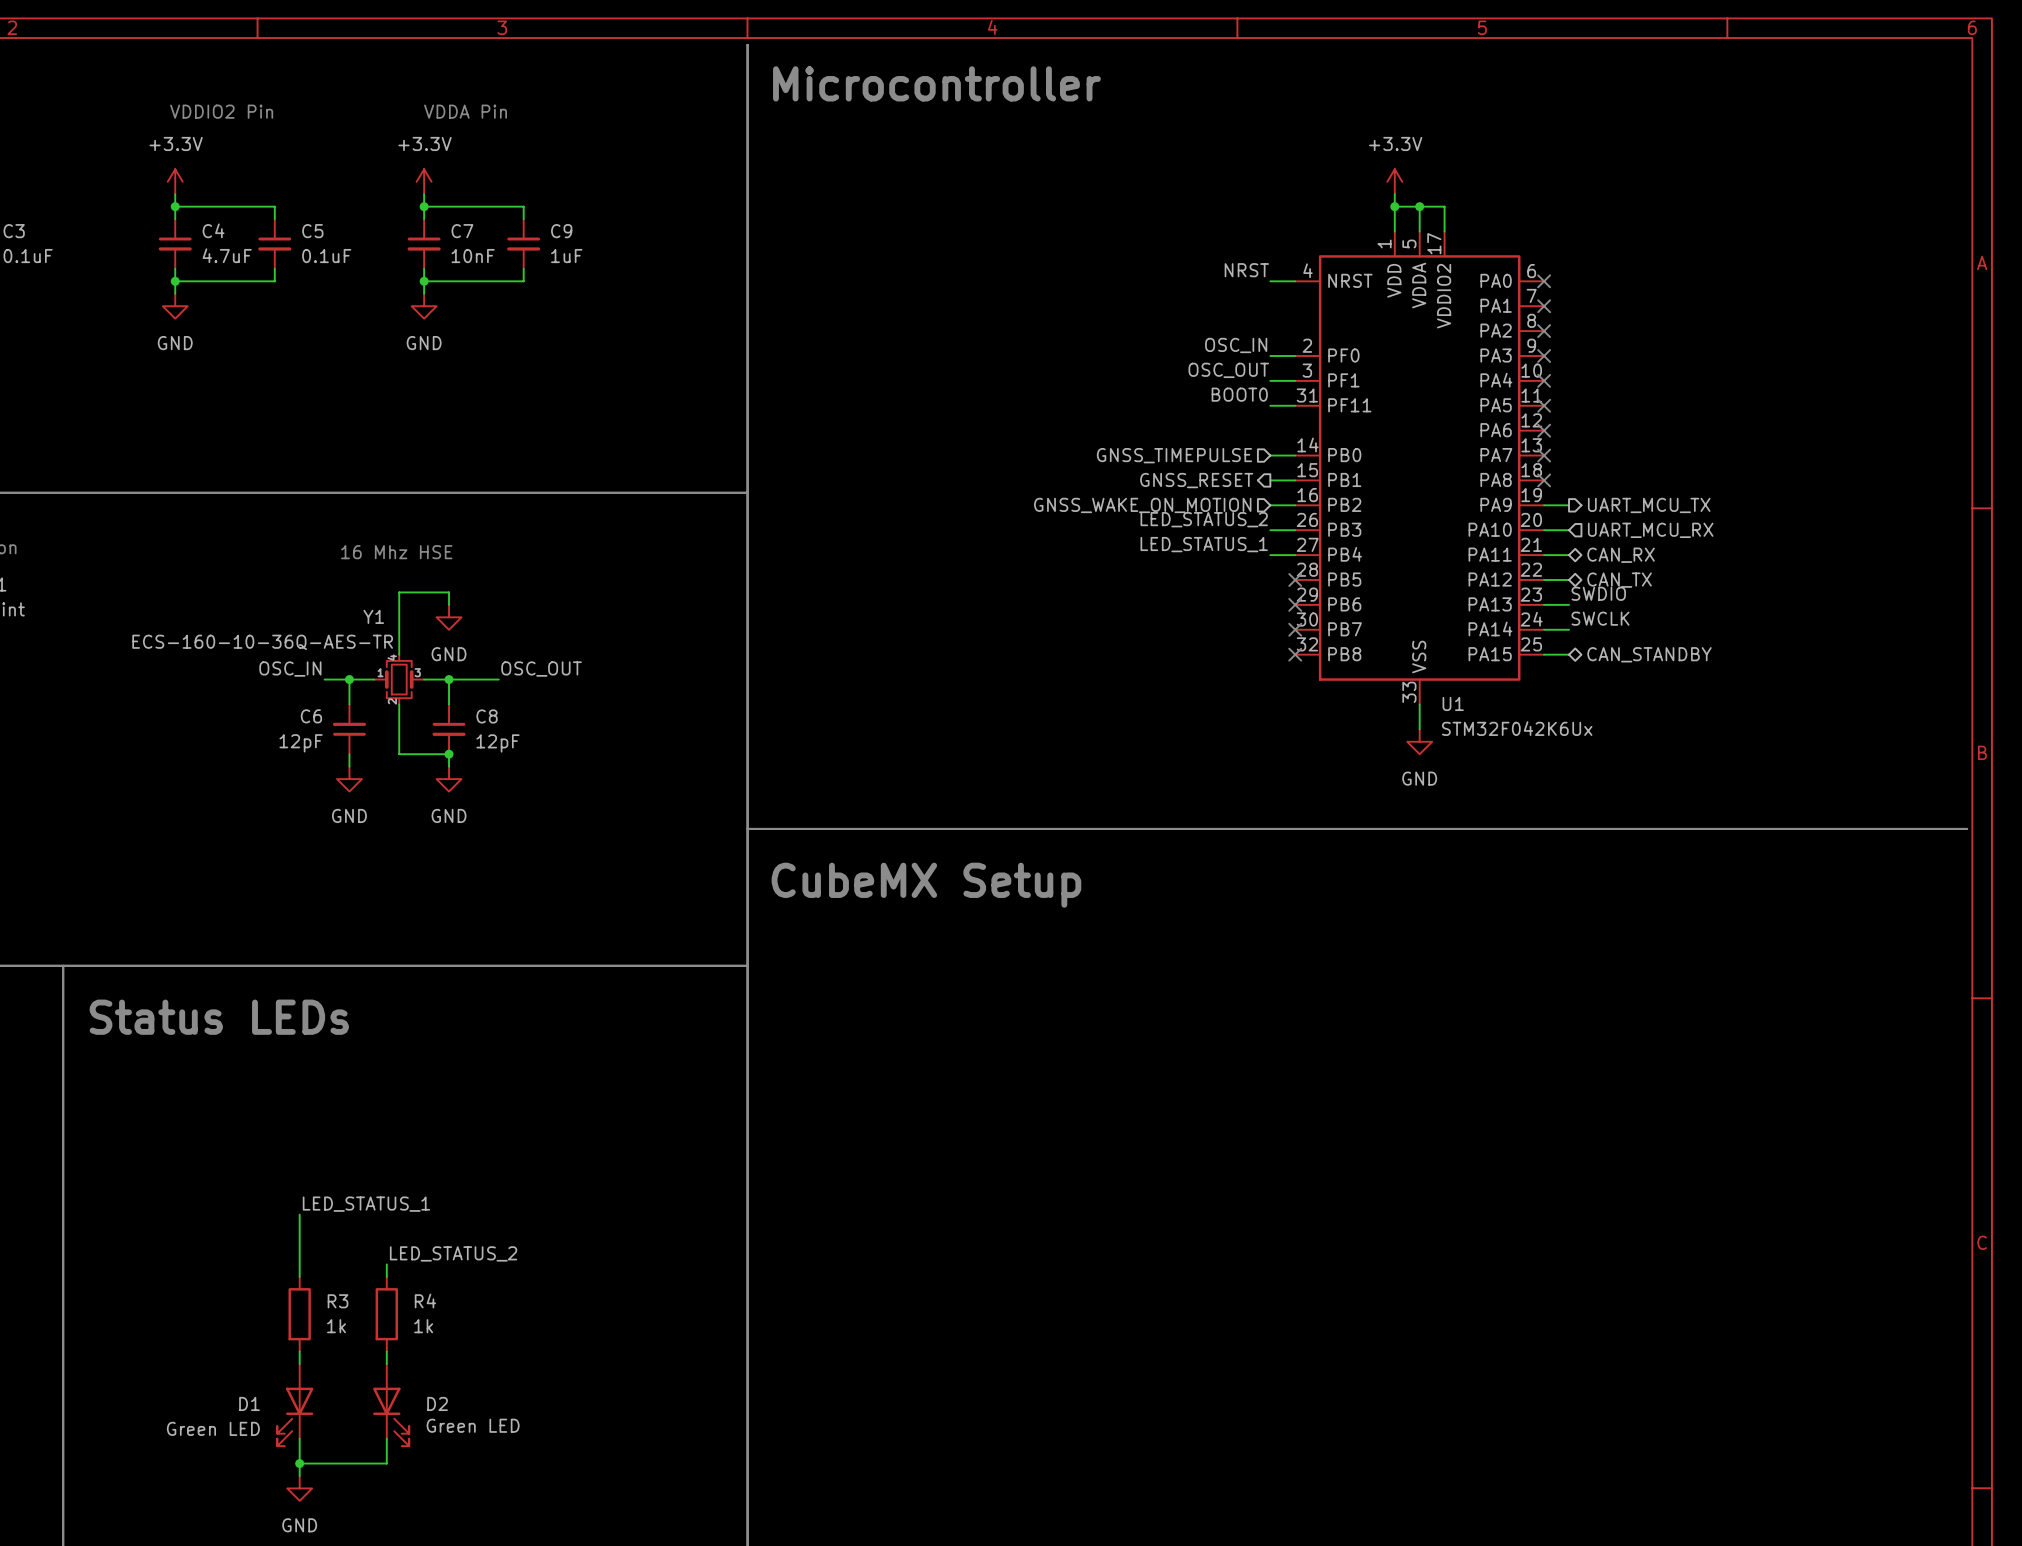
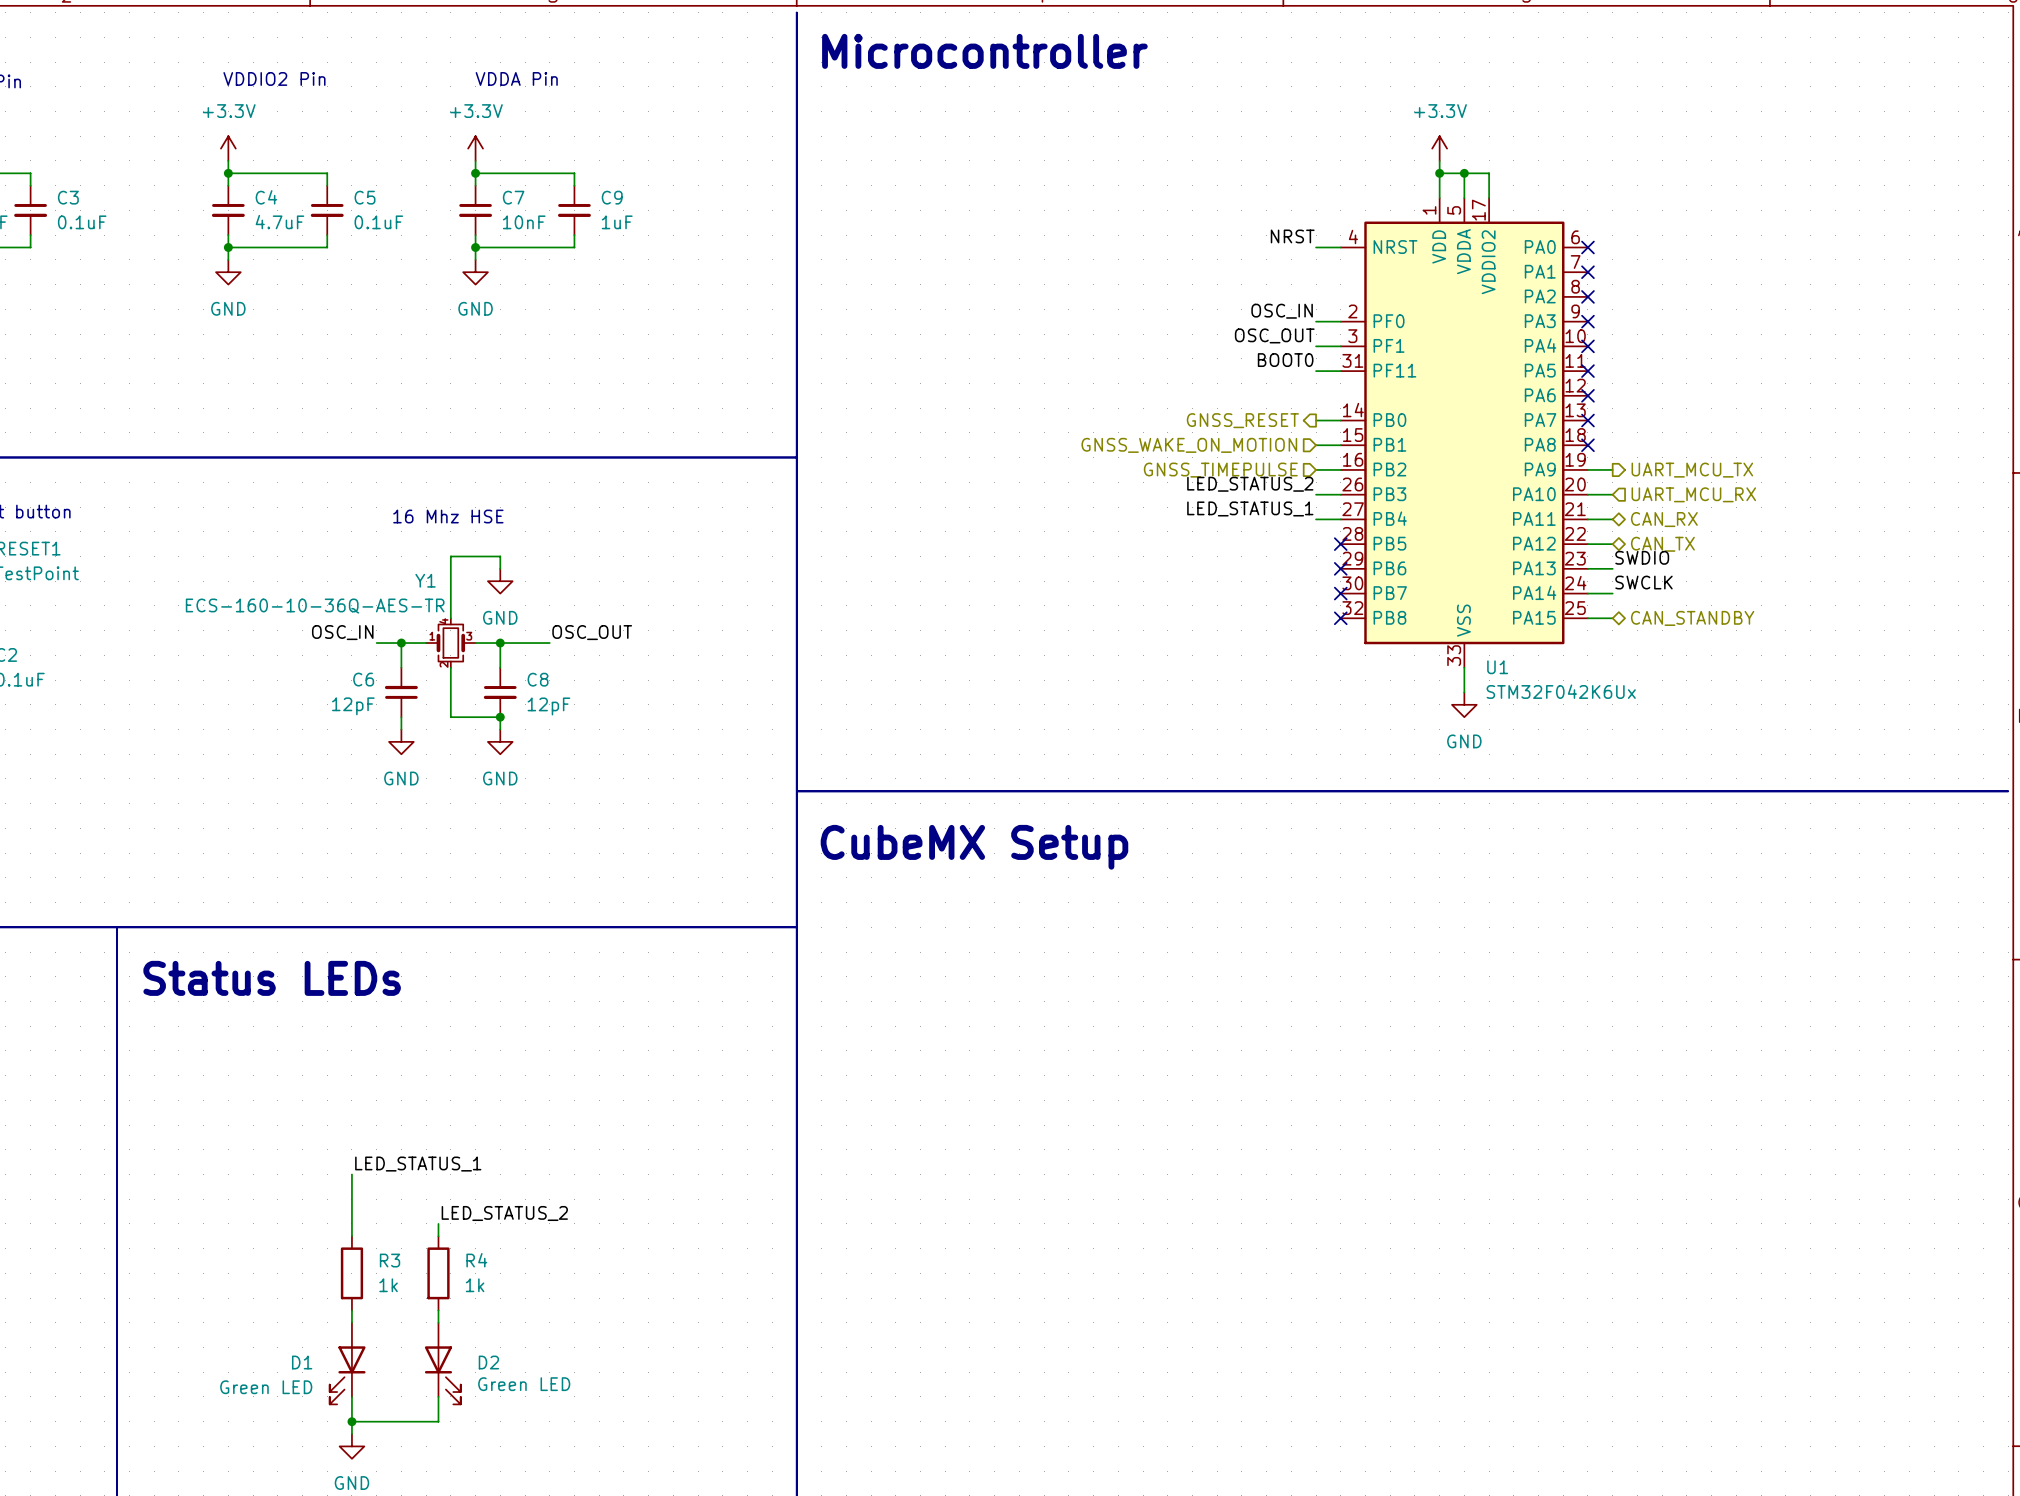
hierarchical label shape: input (1174, 455) -> output (1242, 420)
hierarchical label: GNSS_TIMEPULSE (1174, 455) -> GNSS_RESET (1242, 420)
hierarchical label shape: output (1196, 480) -> input (1189, 445)
hierarchical label: GNSS_RESET (1196, 480) -> GNSS_WAKE_ON_MOTION (1189, 445)
hierarchical label: GNSS_WAKE_ON_MOTION (1142, 505) -> GNSS_TIMEPULSE (1220, 470)

